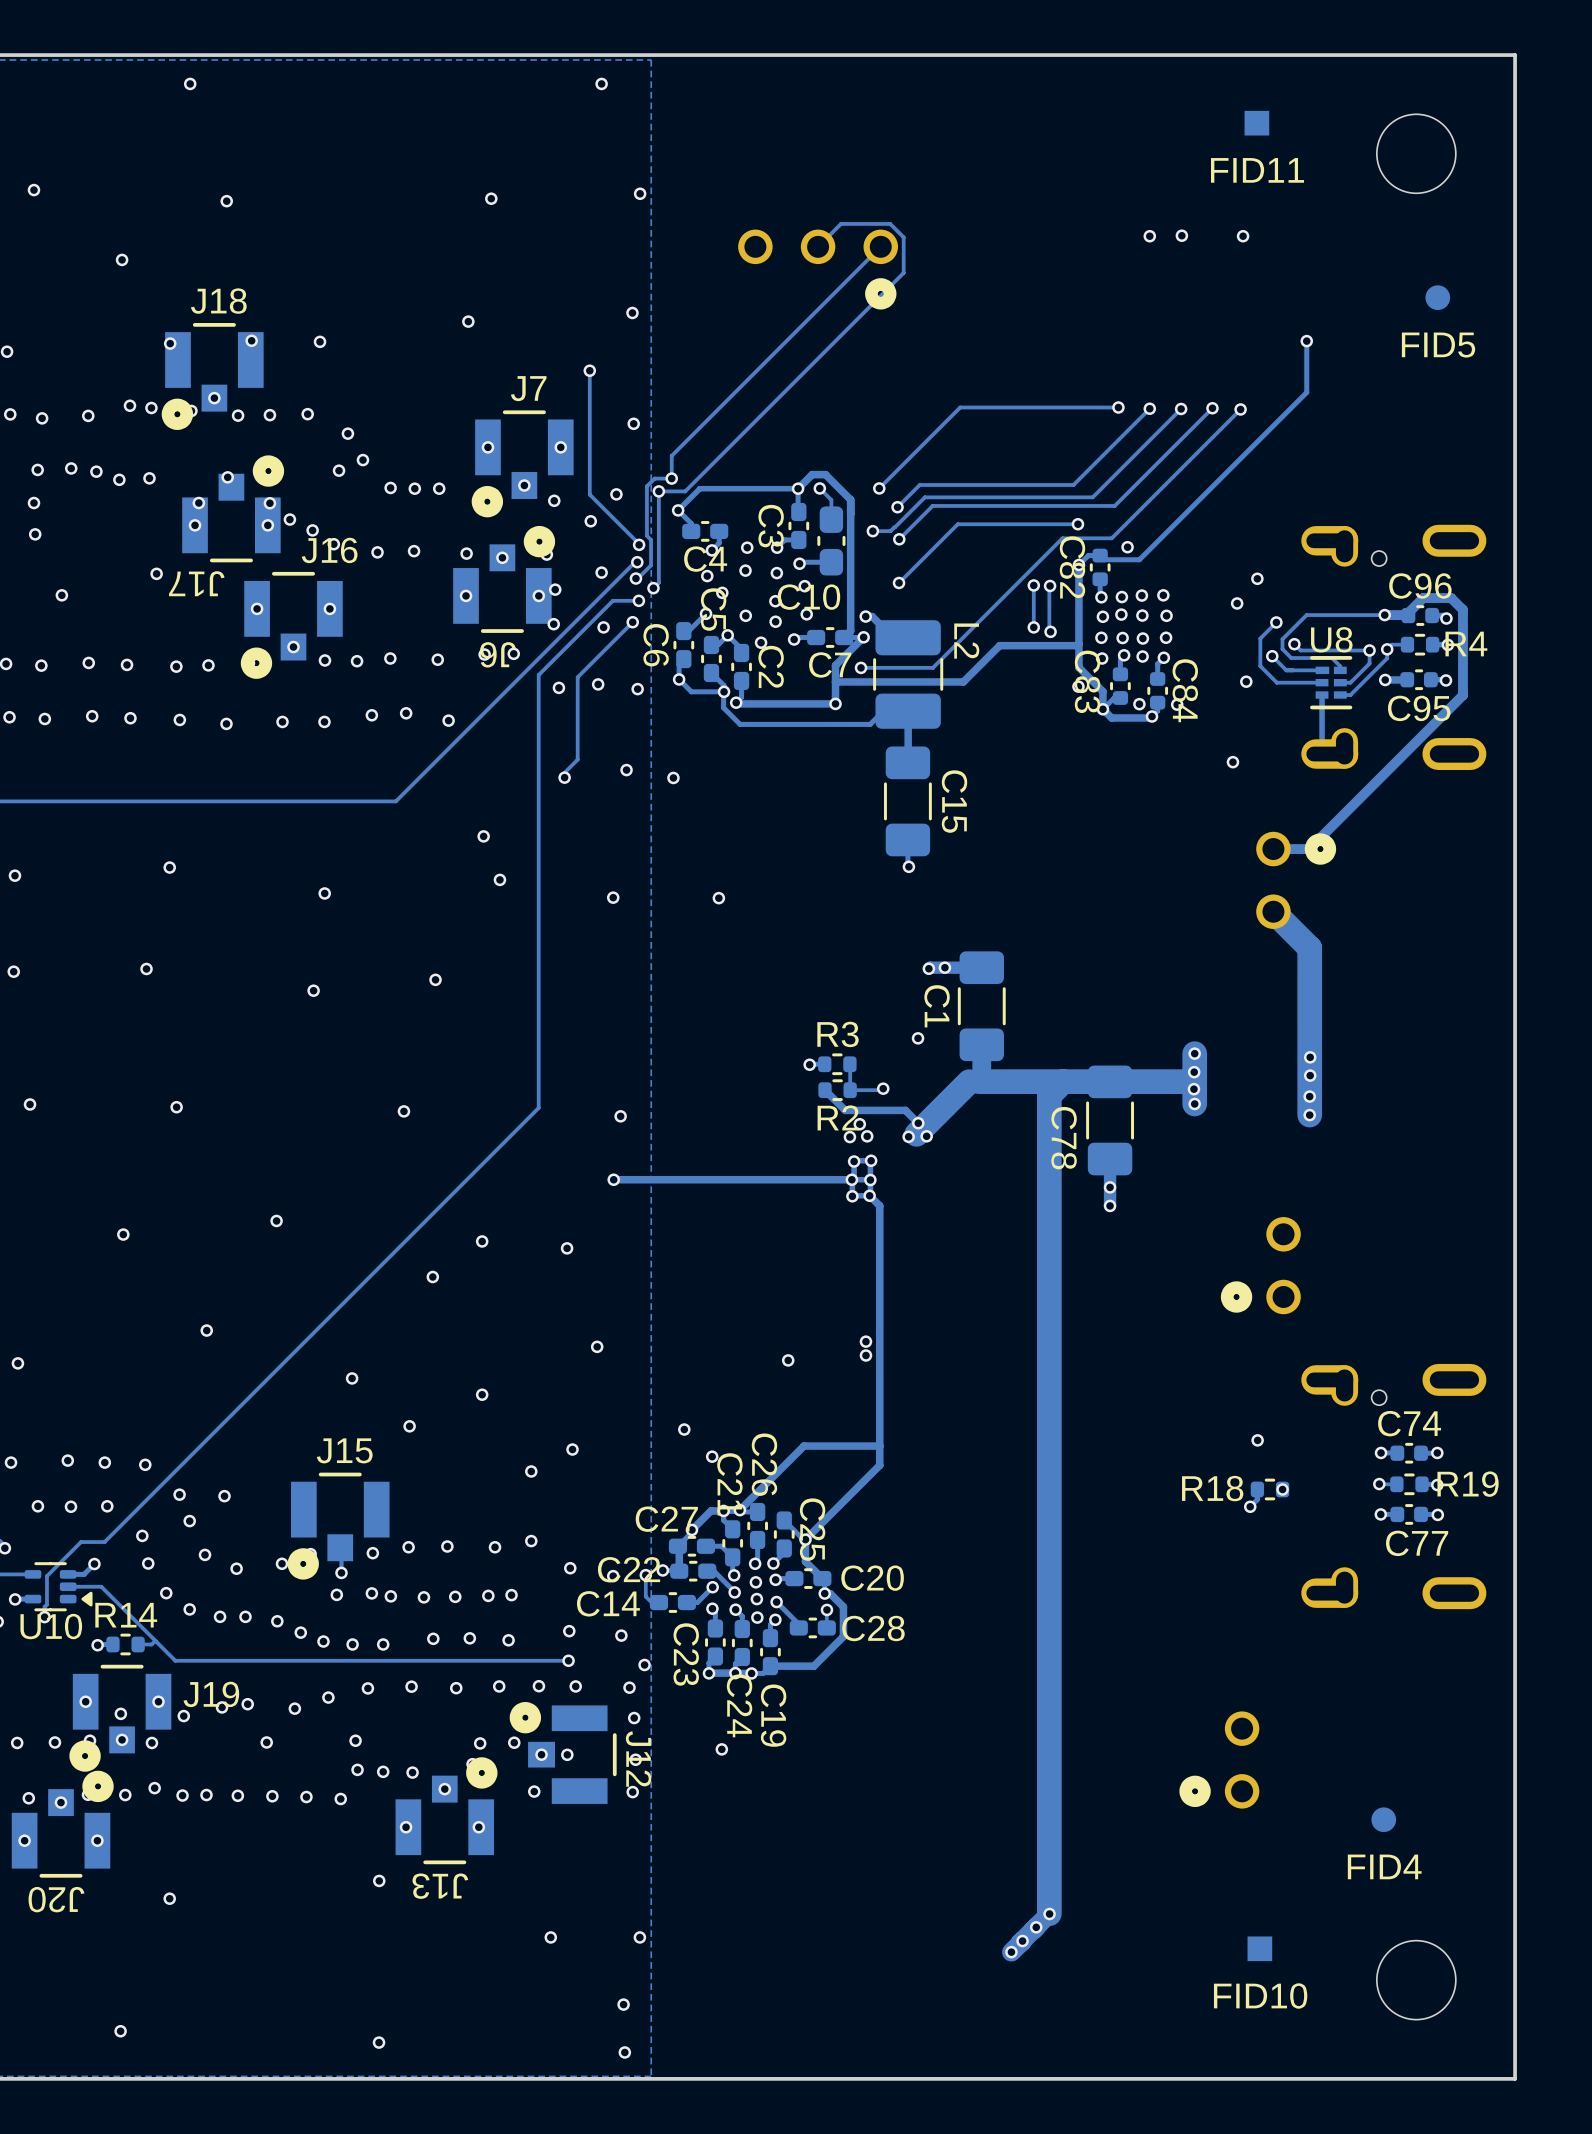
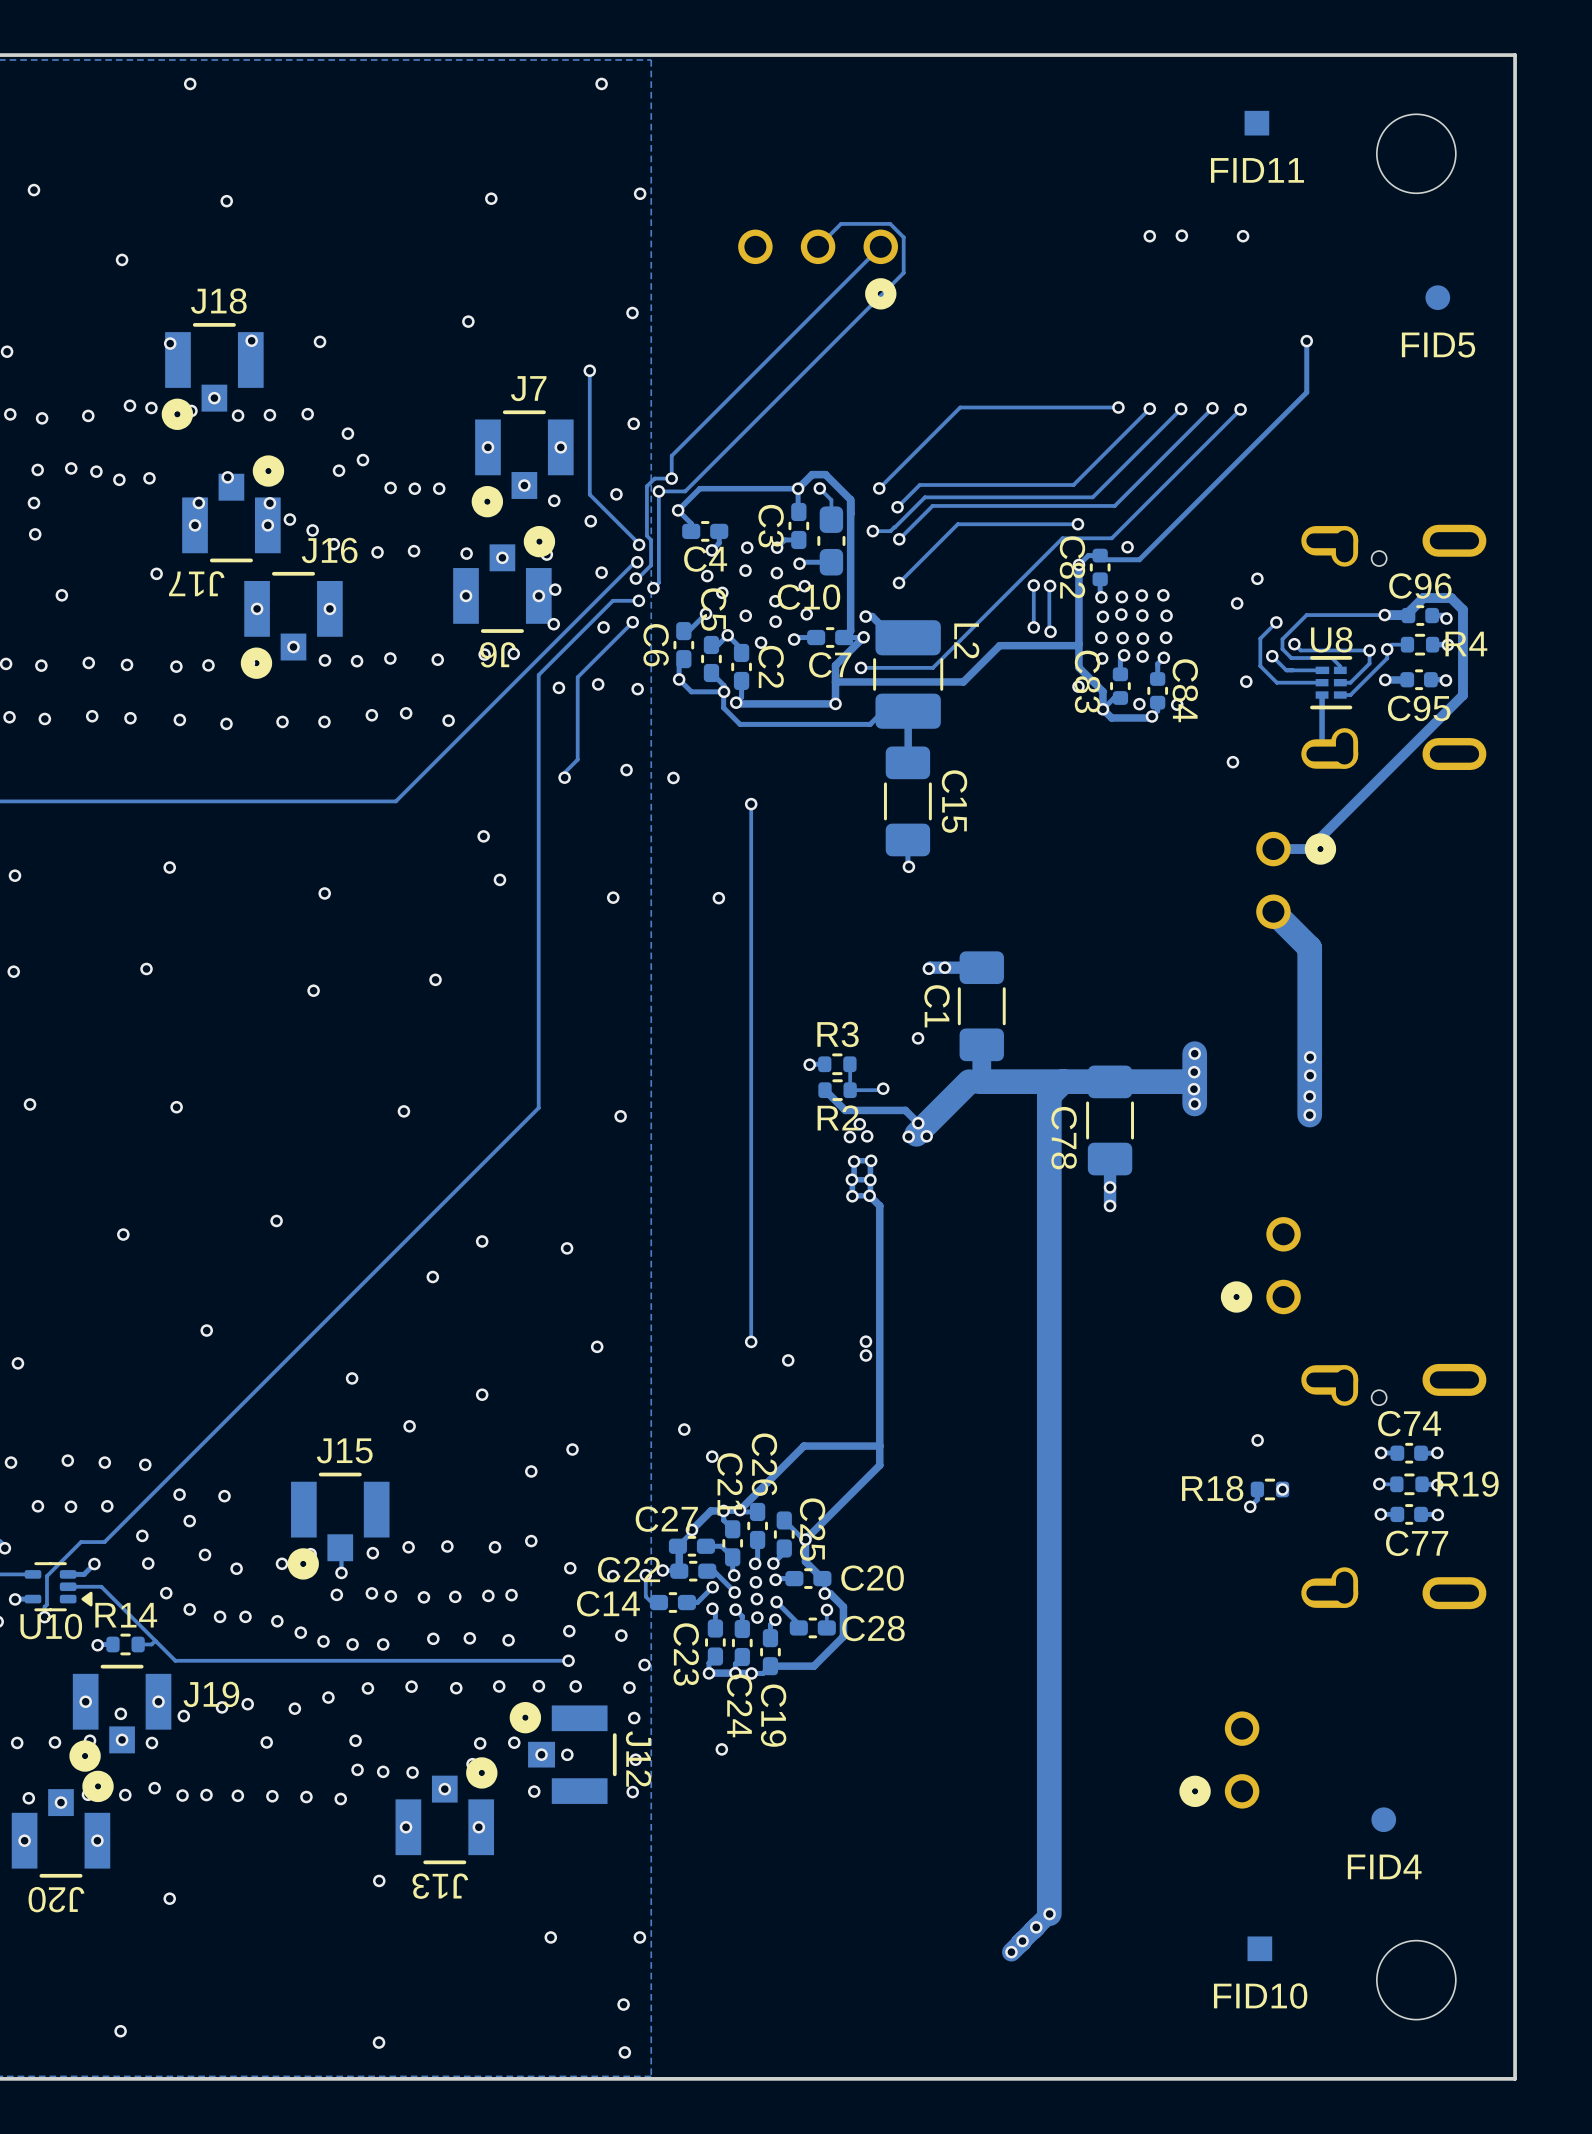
track: none -> (751, 804) (751, 1341)
via: none -> (751, 804)
via: (613, 1179) -> none
track: (851, 1179) (613, 1179) -> none
via: none -> (751, 1341)

